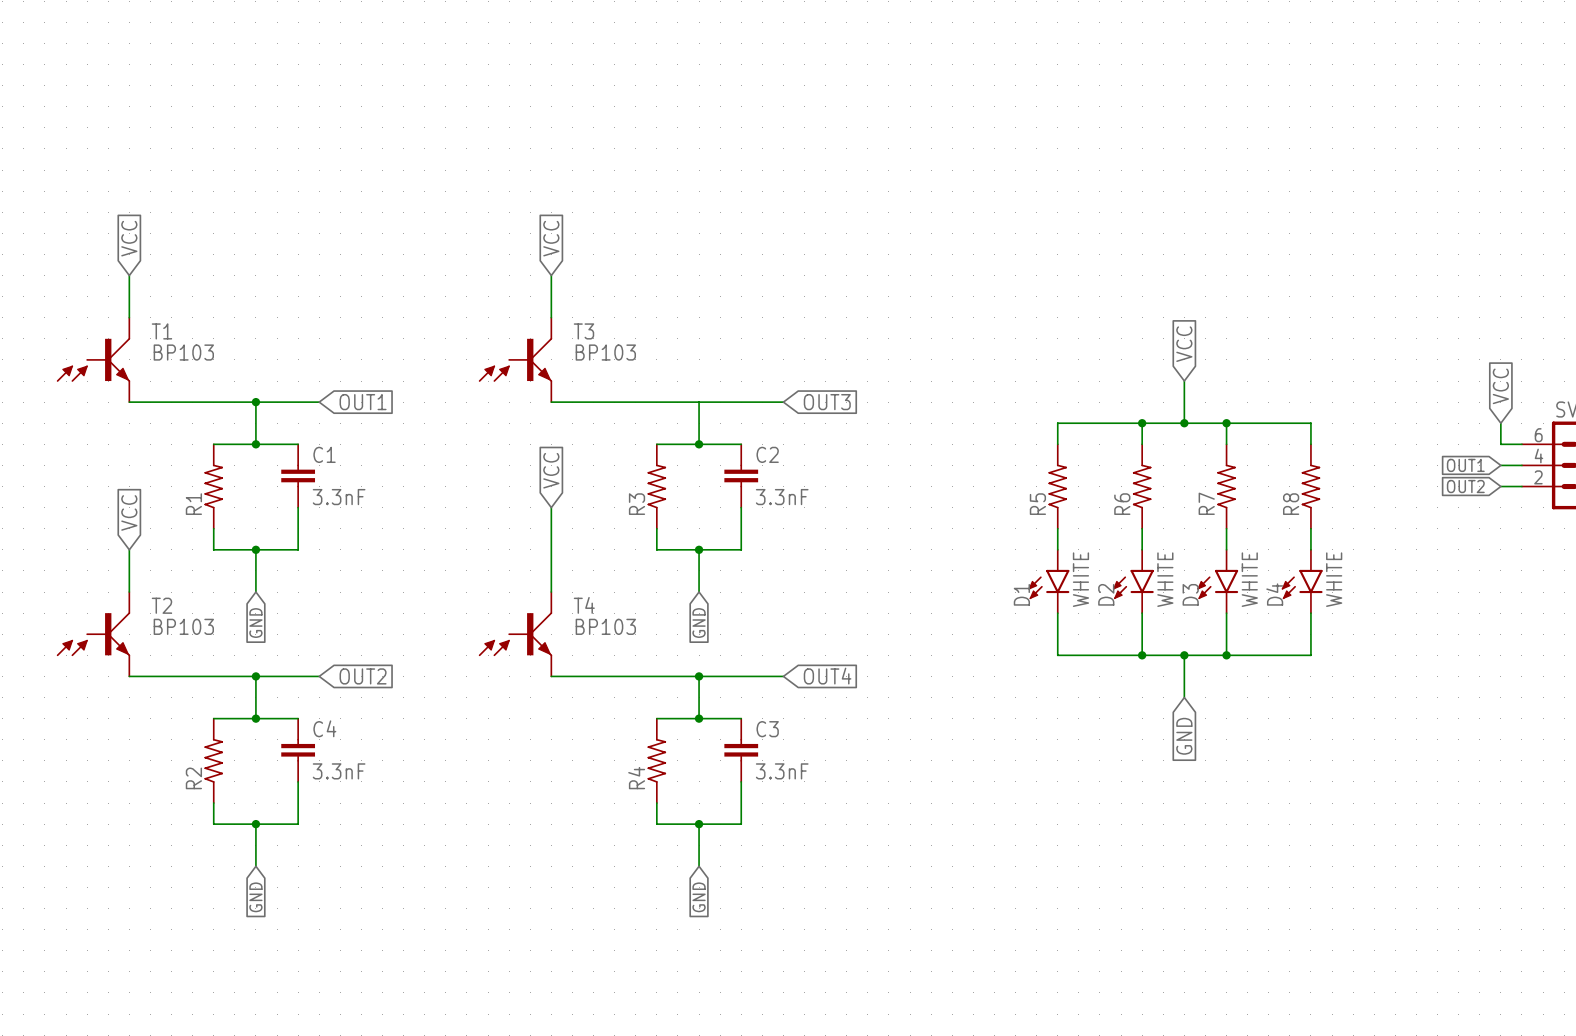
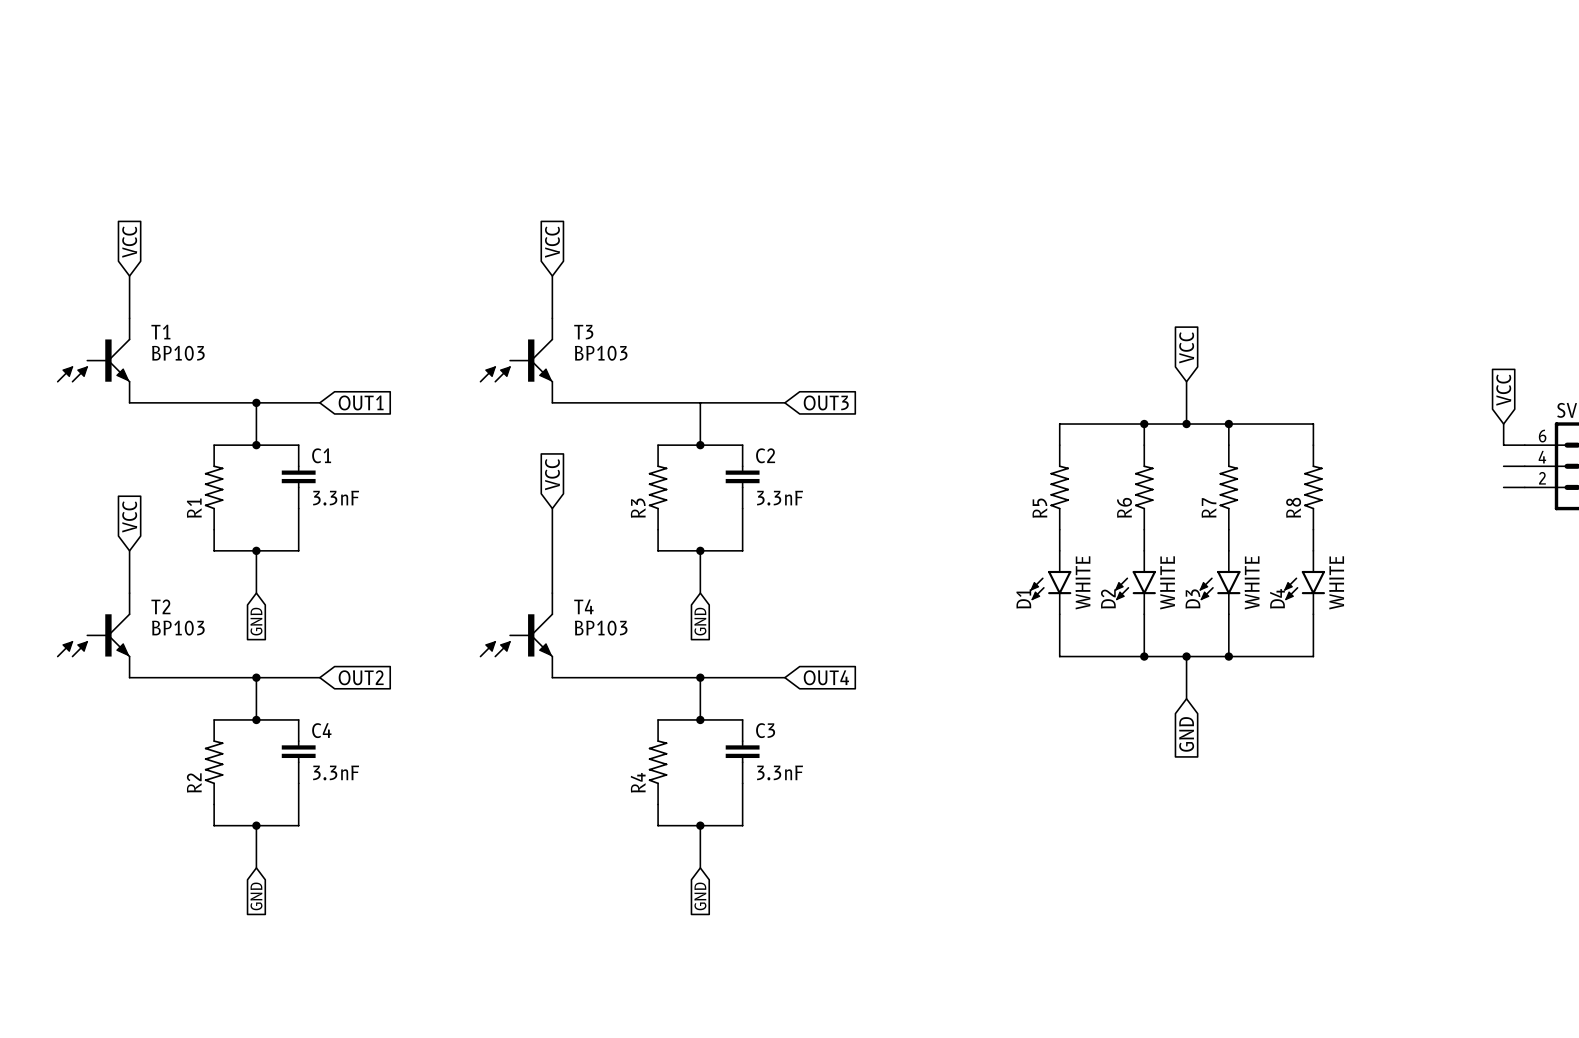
global label: OUT1 (1465, 465) -> none
global label: OUT2 (1465, 486) -> none

